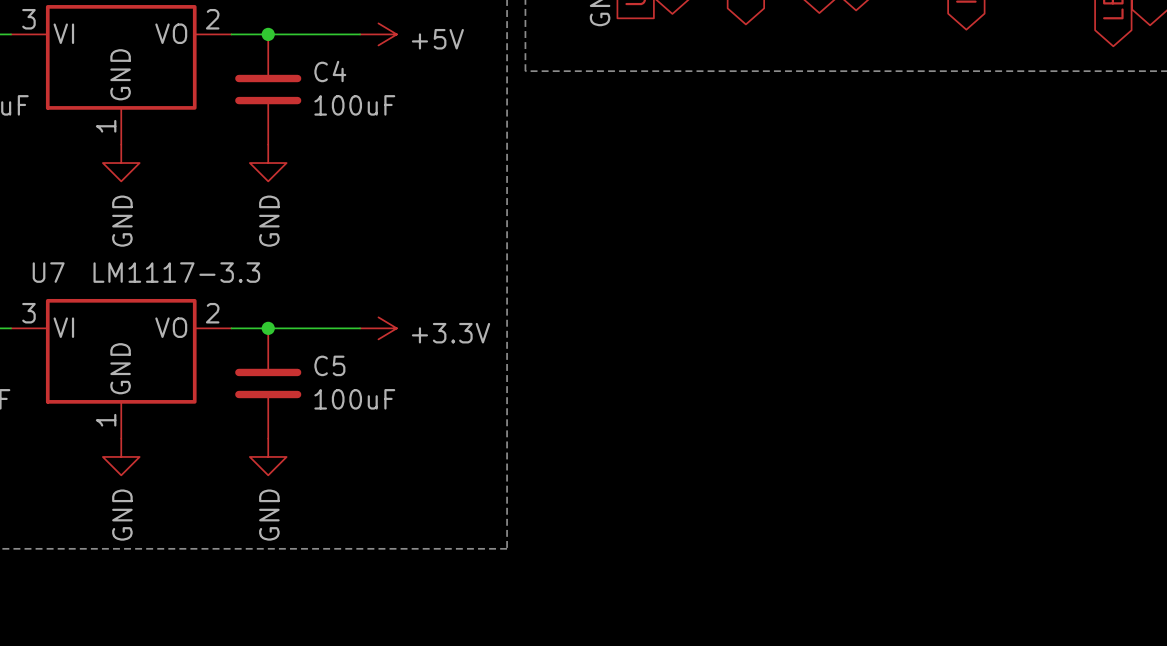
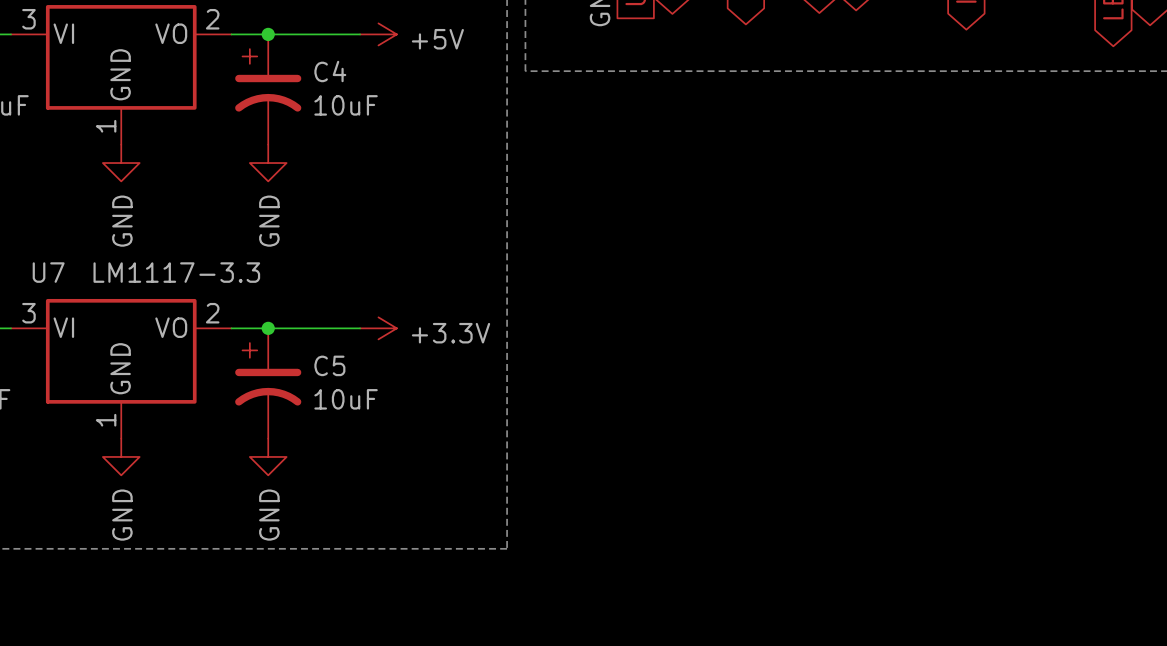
C4 symbol: [235, 34, 302, 145] -> [235, 34, 302, 145]
C4 value: 100uF (354, 105) -> 10uF (346, 105)
C5 symbol: [235, 328, 302, 439] -> [235, 328, 302, 439]
C5 value: 100uF (354, 399) -> 10uF (346, 399)

